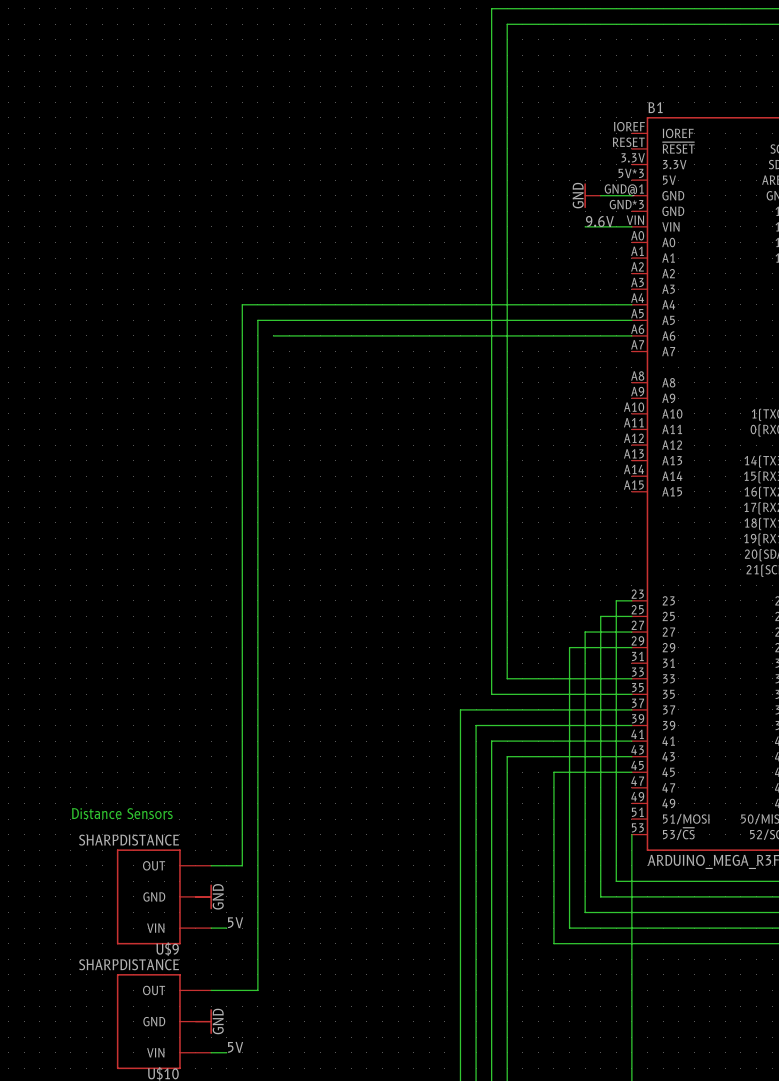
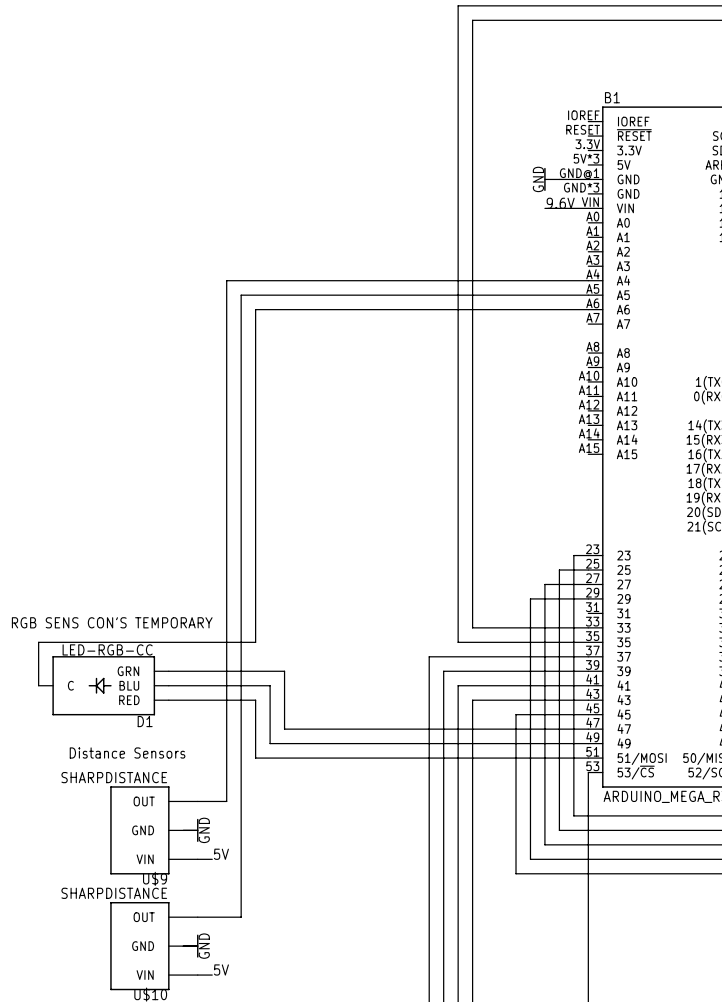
wire: none -> (255, 309) (255, 642) (38, 642) (38, 685)
text: none -> RGB SENS CON'S TEMPORARY (112, 622)
wire: none -> (168, 671) (284, 671) (284, 729) (588, 729)
D1: none -> LED-RGB-CC (103, 685)
wire: none -> (168, 685) (270, 685) (270, 743) (588, 743)
wire: none -> (168, 700) (255, 700) (255, 758) (588, 758)

